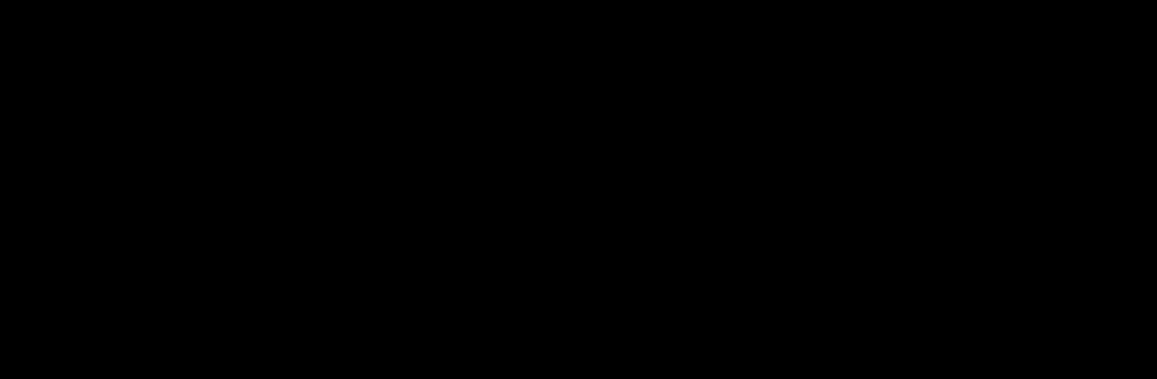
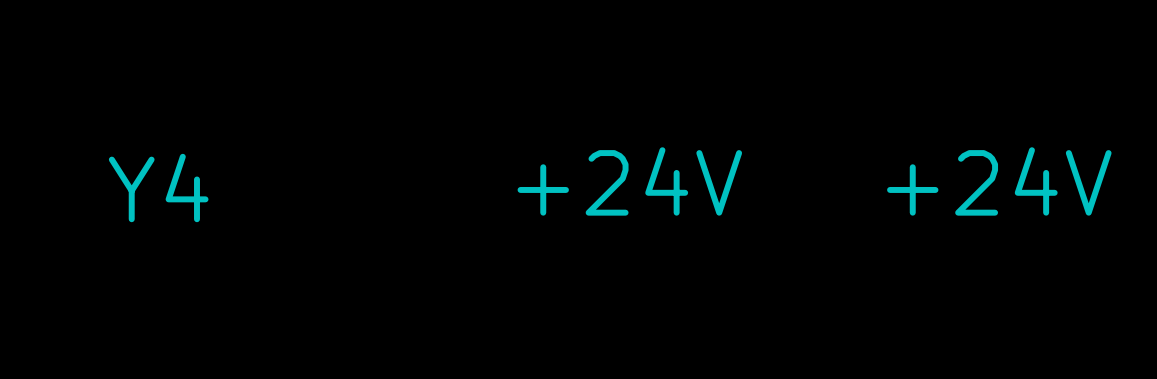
text: none -> +24V (629, 181)
text: none -> +24V (999, 181)
text: none -> Y4 (158, 188)

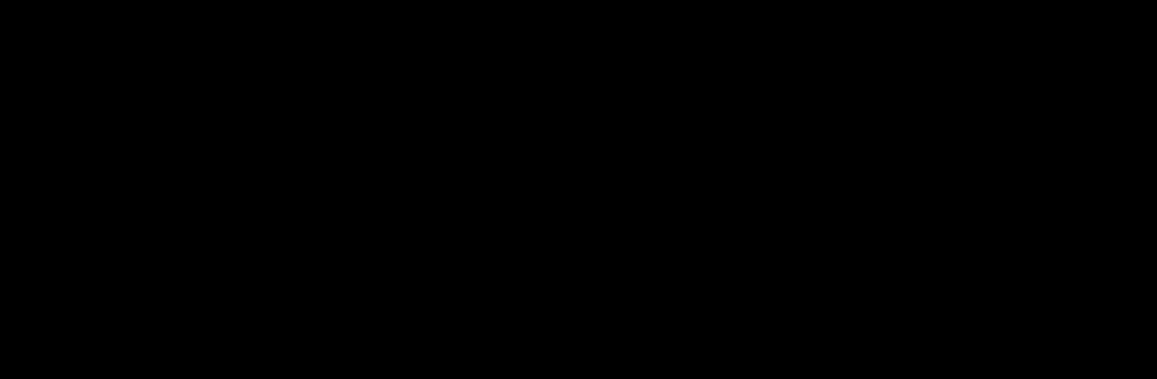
text: +24V (629, 181) -> none
text: +24V (999, 181) -> none
text: Y4 (158, 188) -> none

